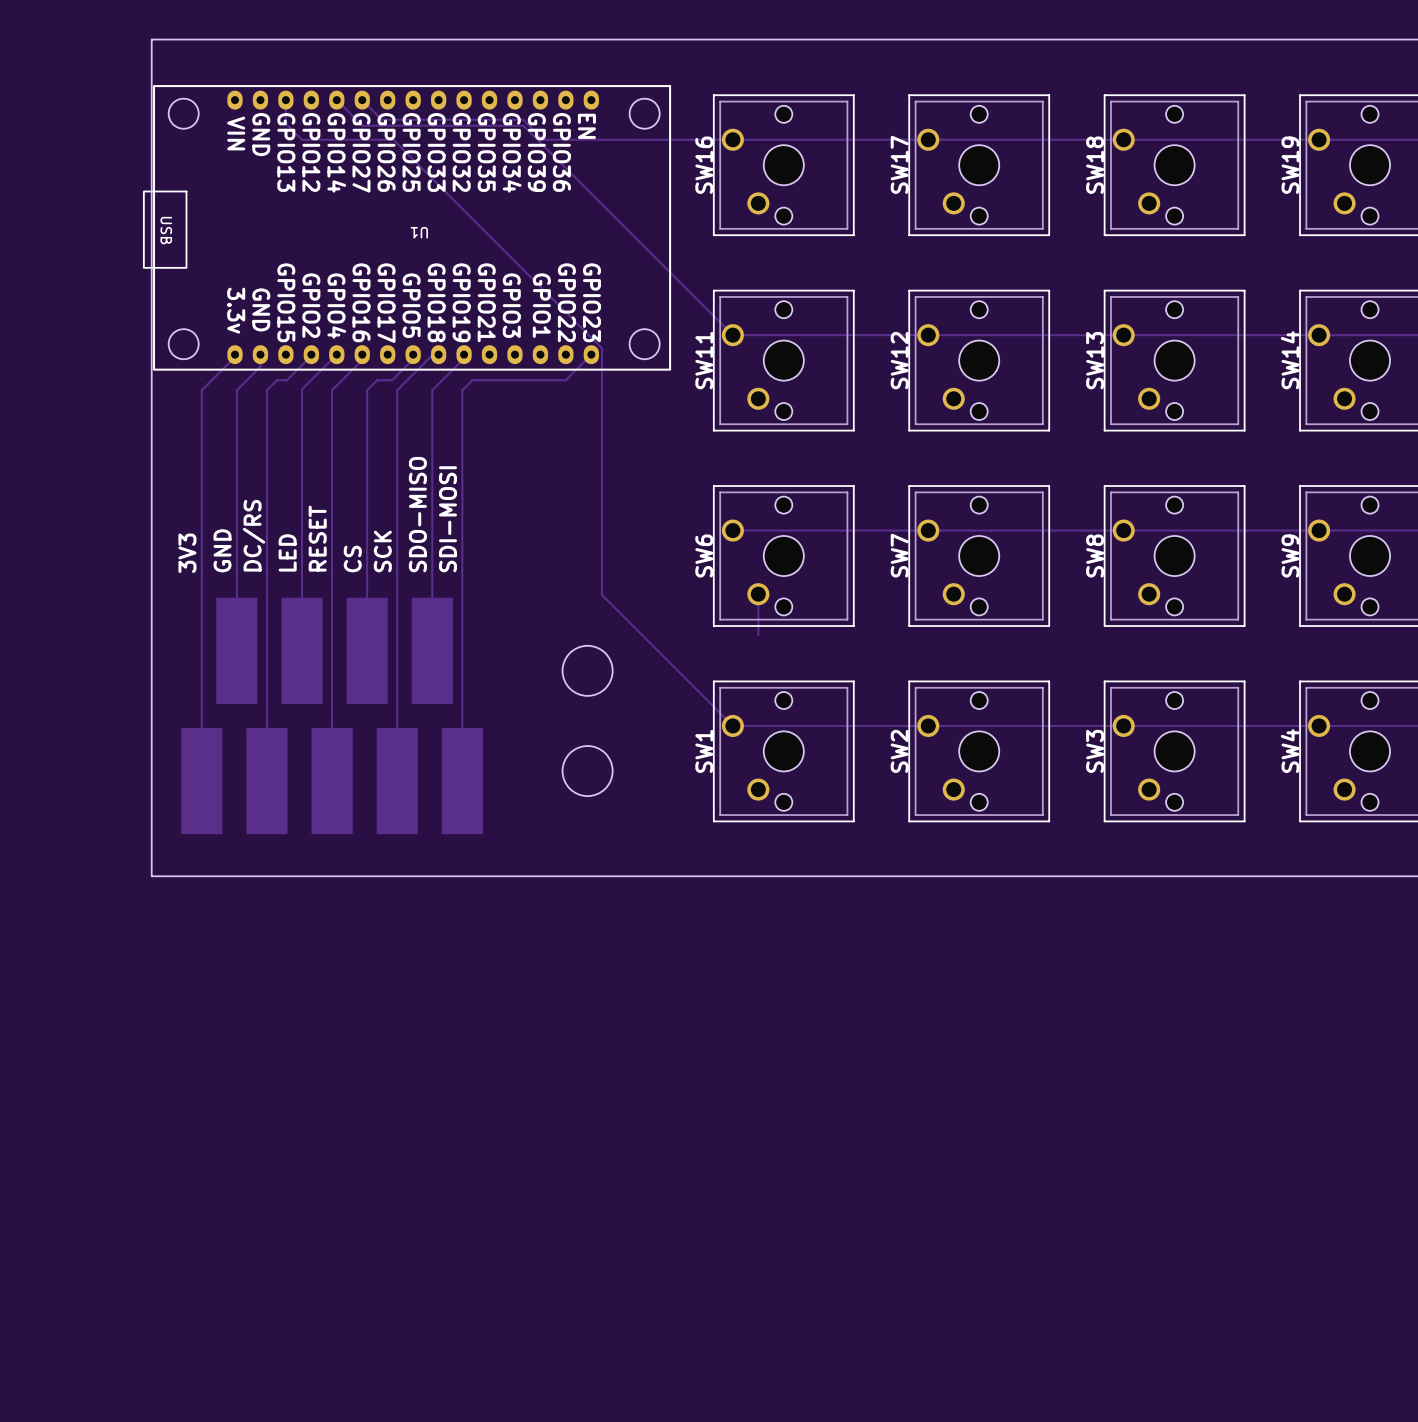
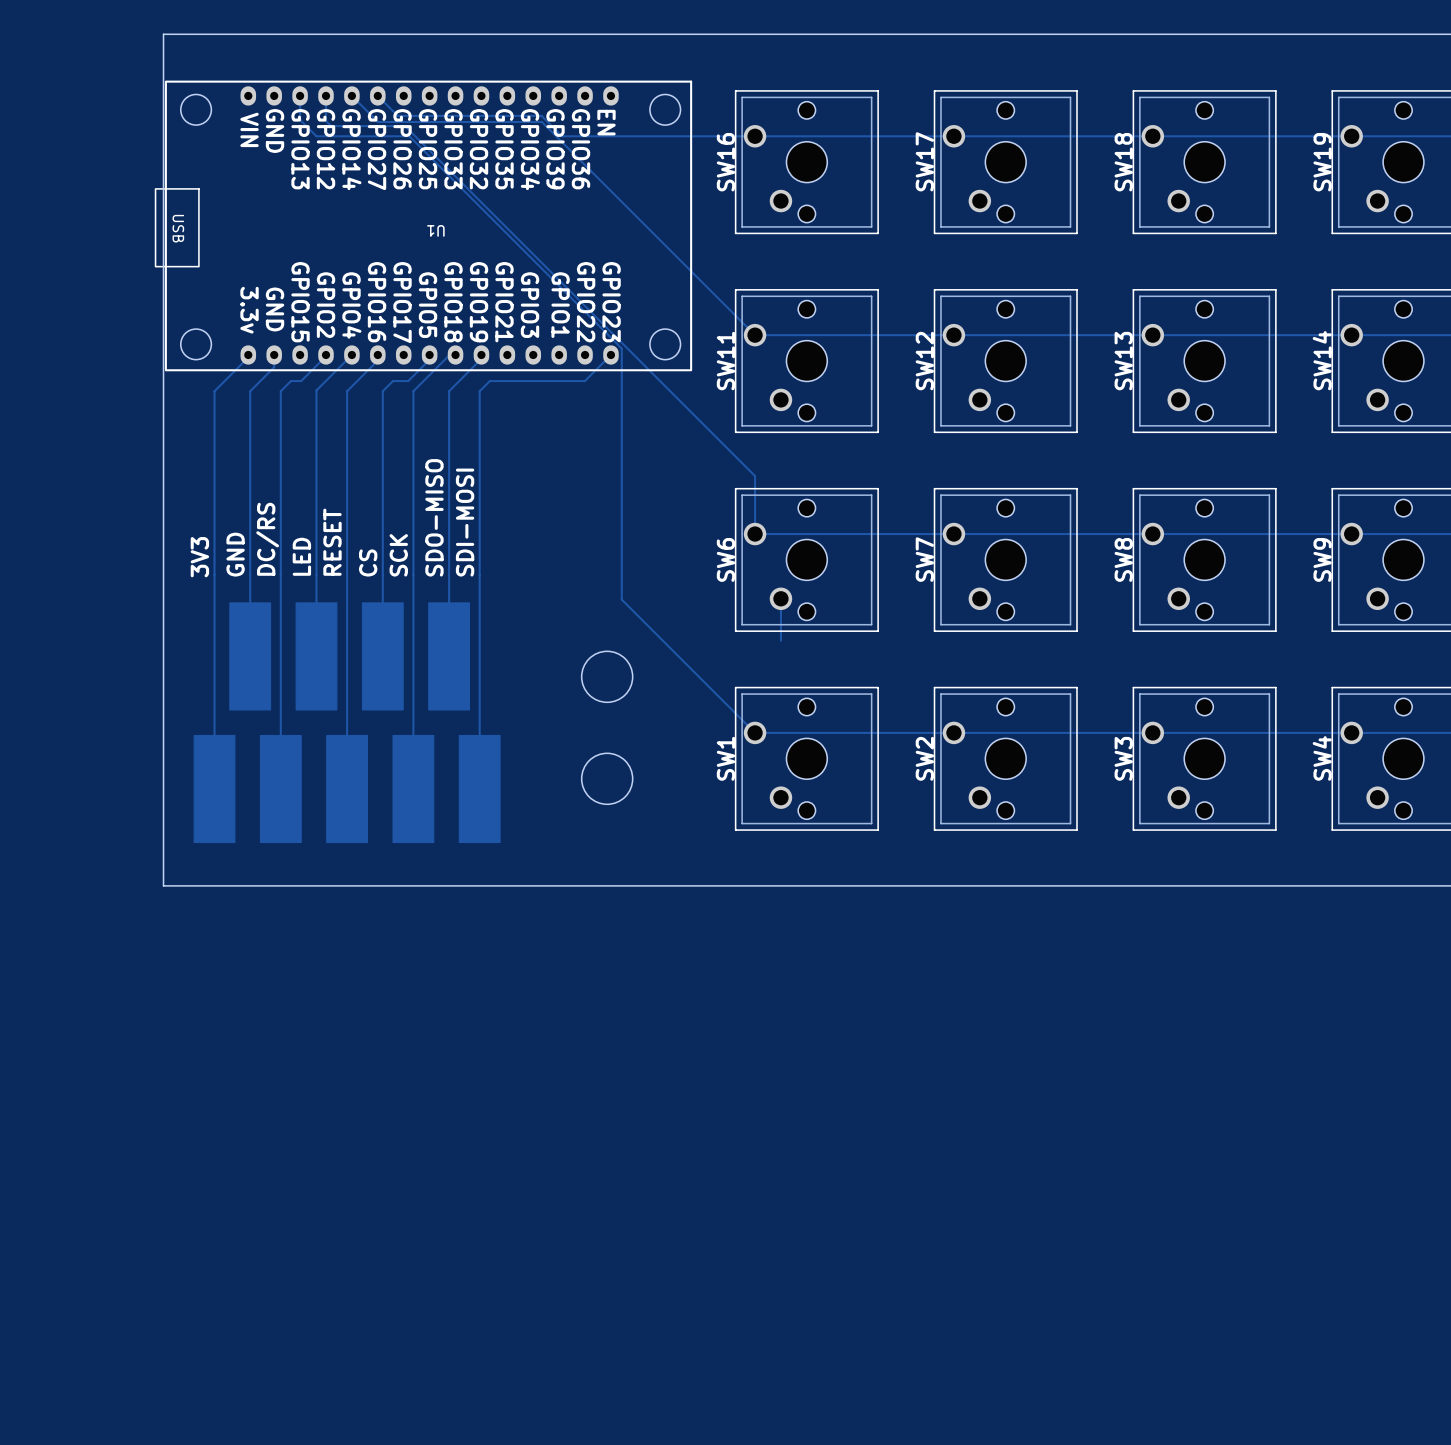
track: none -> (326, 95) (326, 120) (331, 126) (405, 126) (755, 476) (755, 534)

